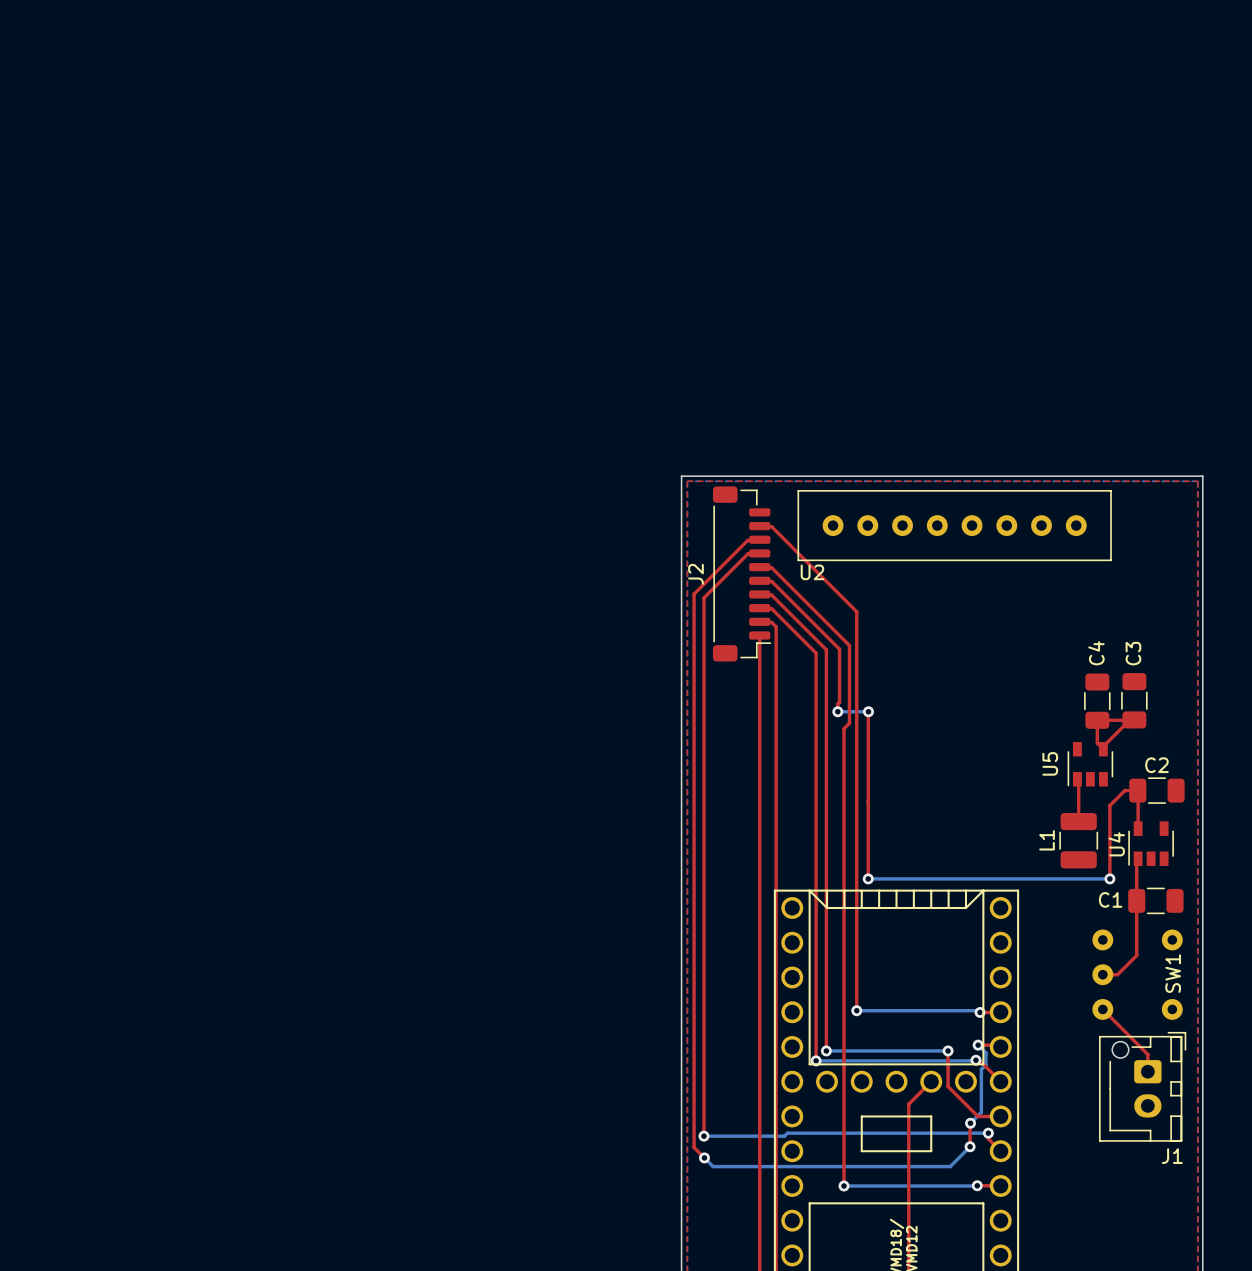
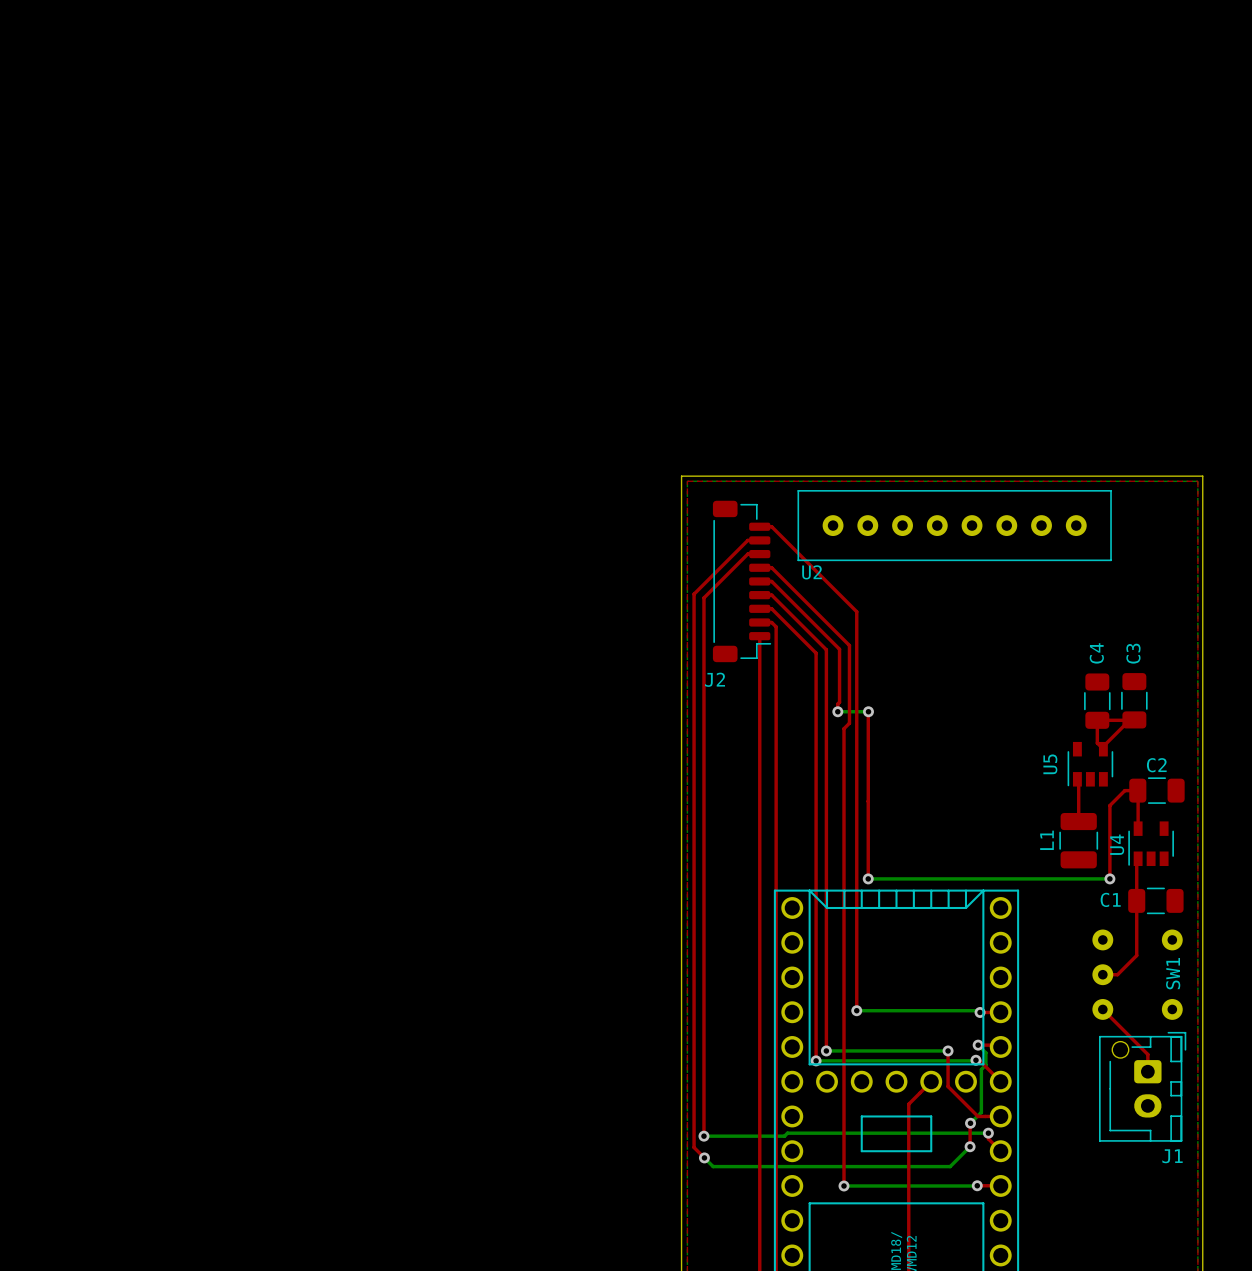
J2 footprint: [712, 486, 772, 662] -> [712, 500, 772, 663]
J2 name position: J2 (695, 574) -> J2 (715, 679)

